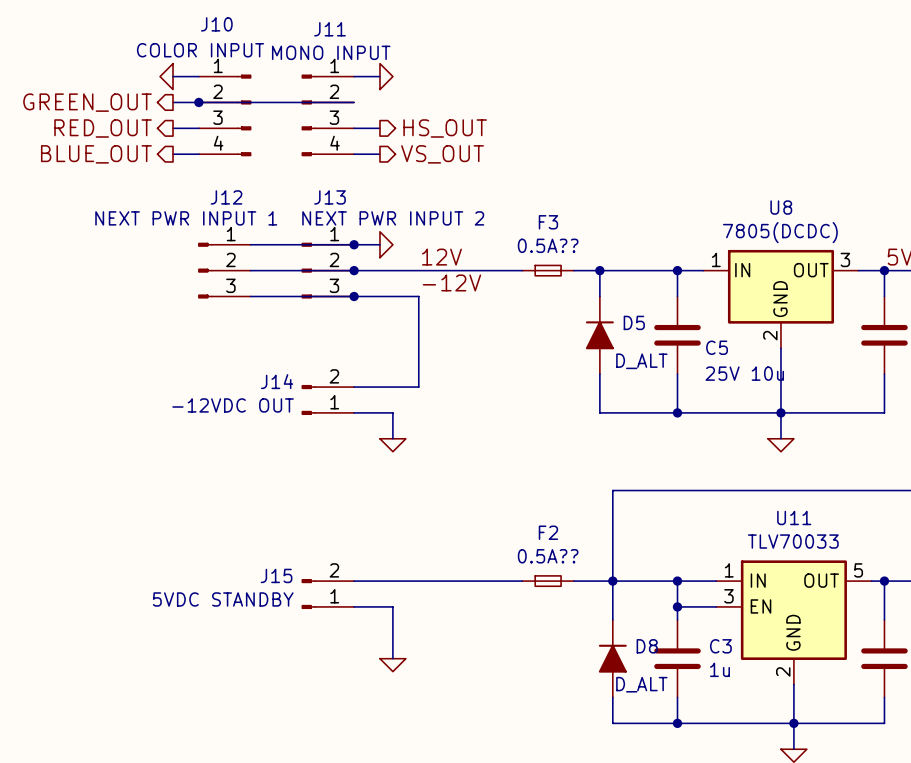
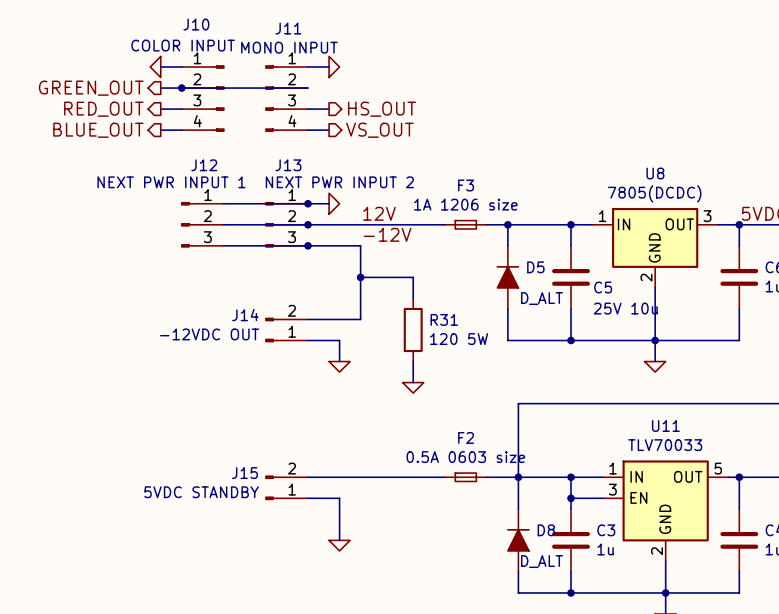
F3 value: 0.5A?? (548, 245) -> 1A 1206 size (465, 204)
wire: none -> (360, 277) (413, 277) (413, 298)
junction: none -> (360, 277)
R31: none -> 120 5W (413, 329)
wire: none -> (413, 361) (413, 382)
power symbol: none -> (413, 387)
F2 value: 0.5A?? (548, 556) -> 0.5A 0603 size (465, 457)

